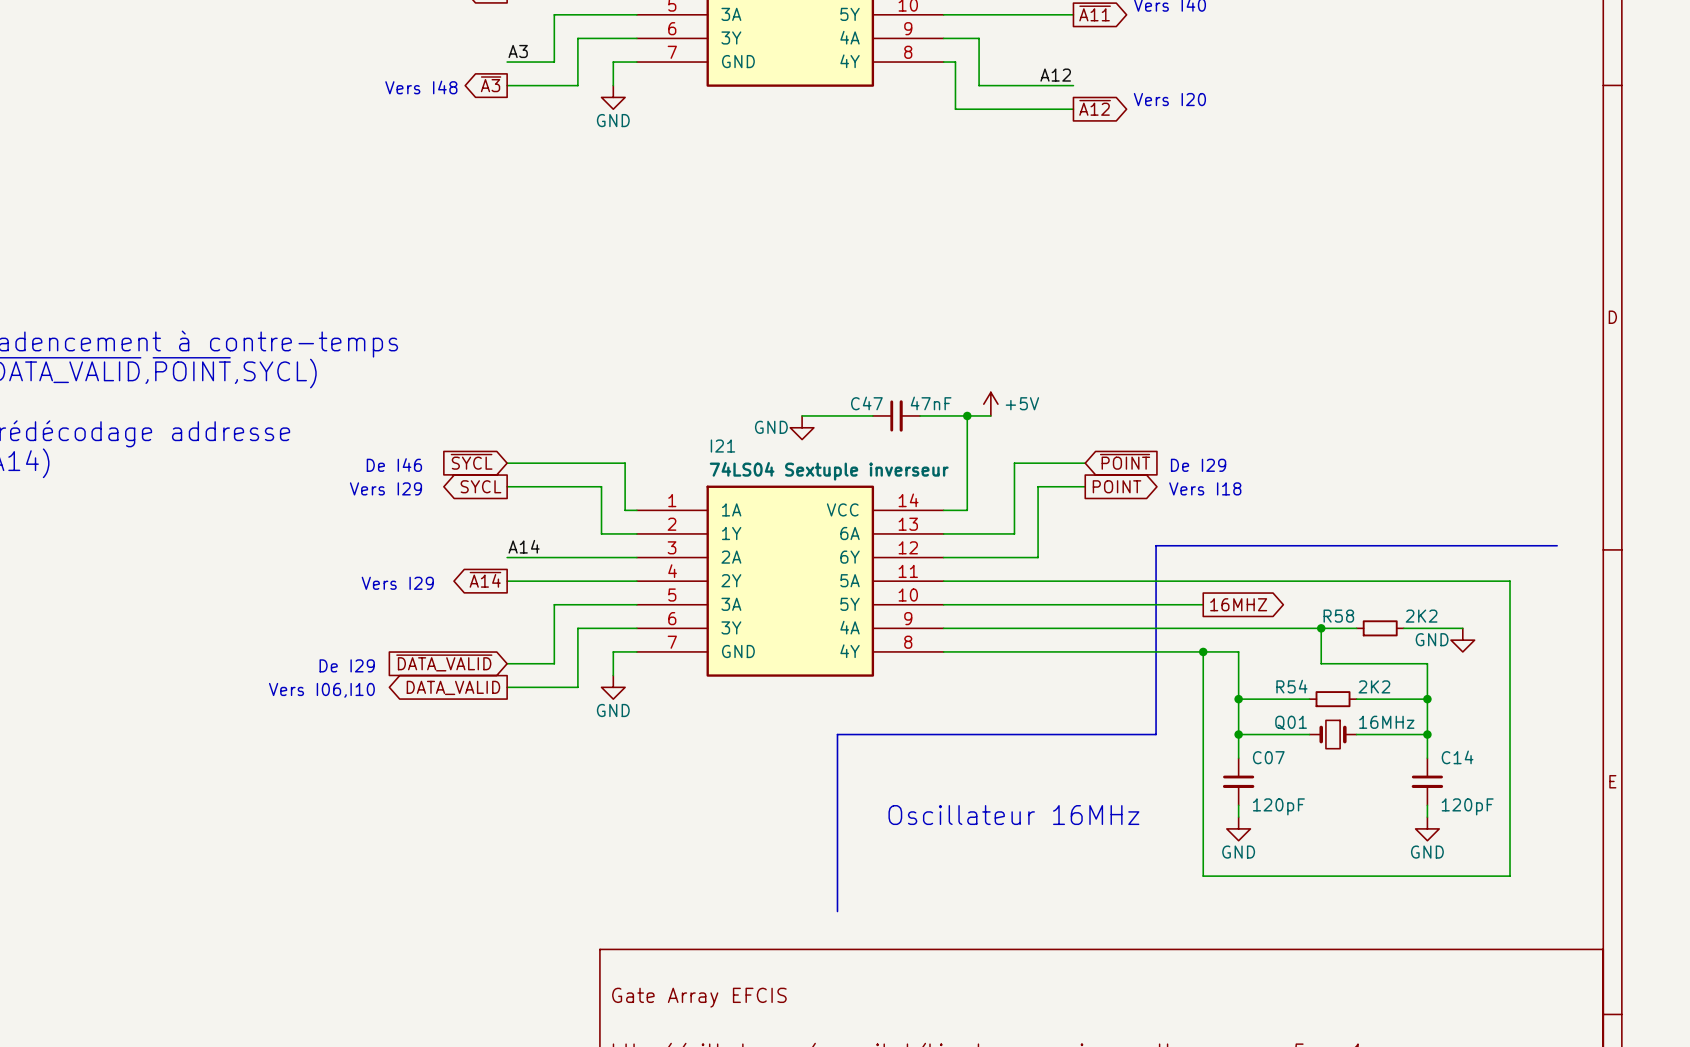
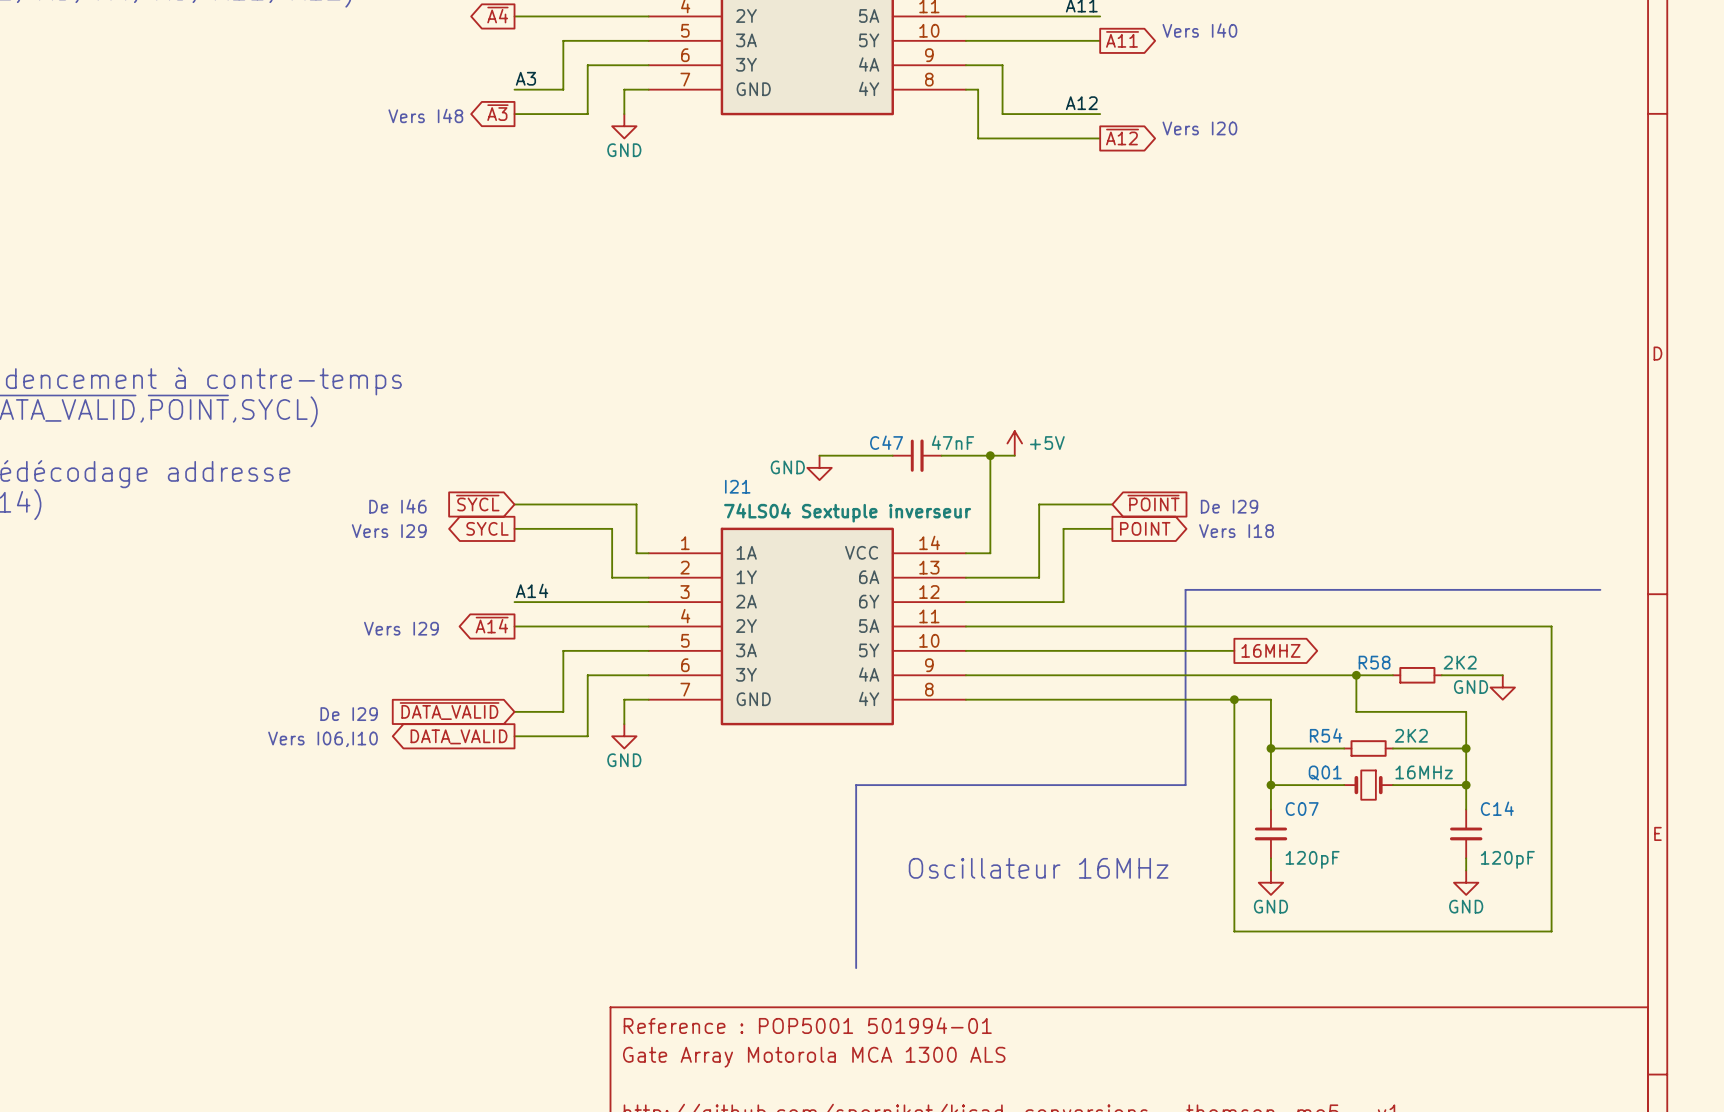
title block: none -> Reference : POP5001 501994-01 (807, 1025)
title block: Gate Array EFCIS (699, 997) -> Gate Array Motorola MCA 1300 ALS (814, 1057)

